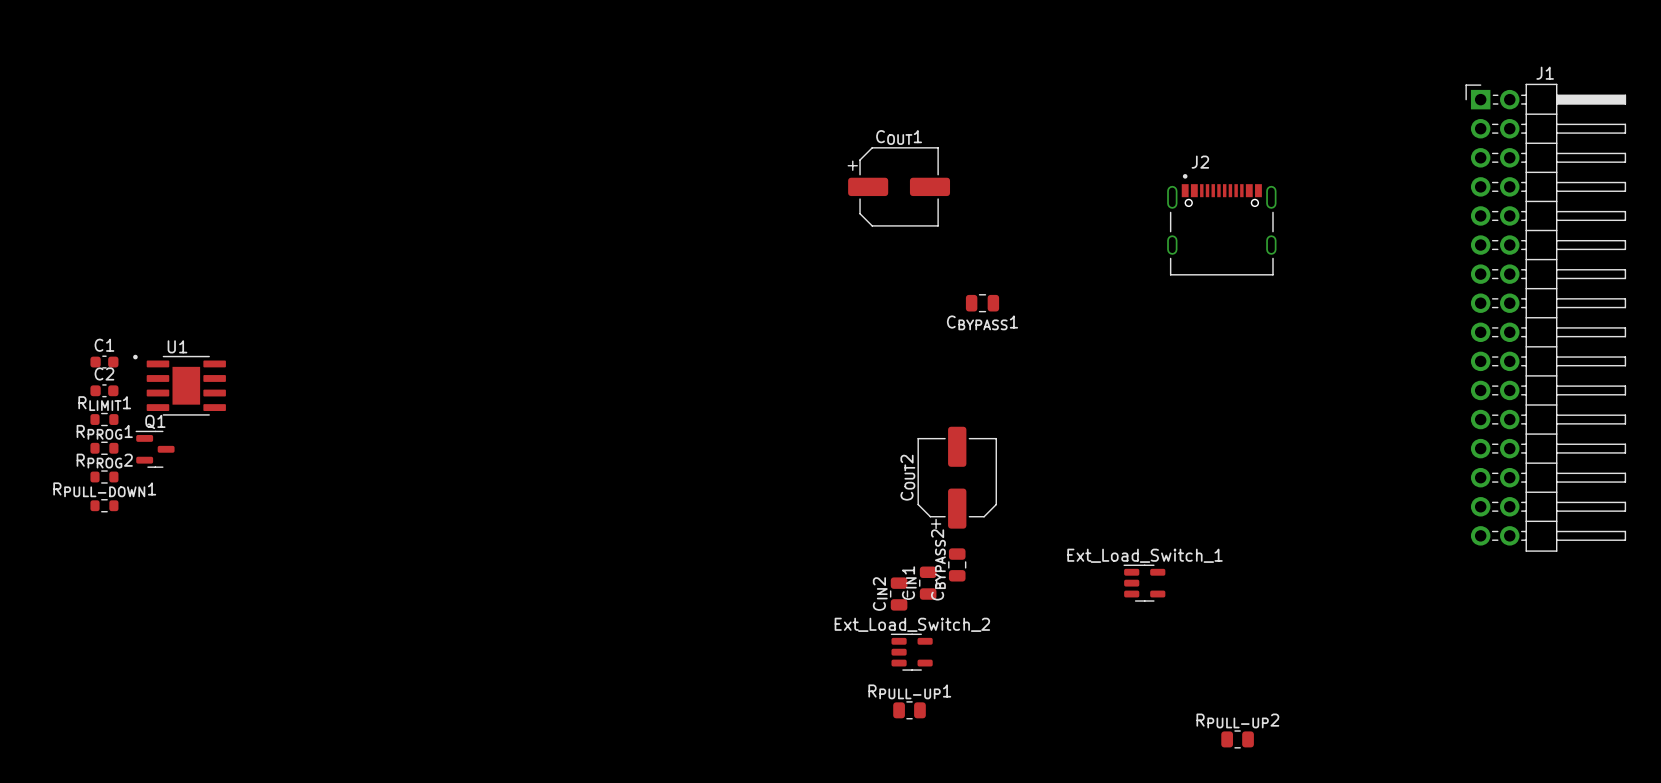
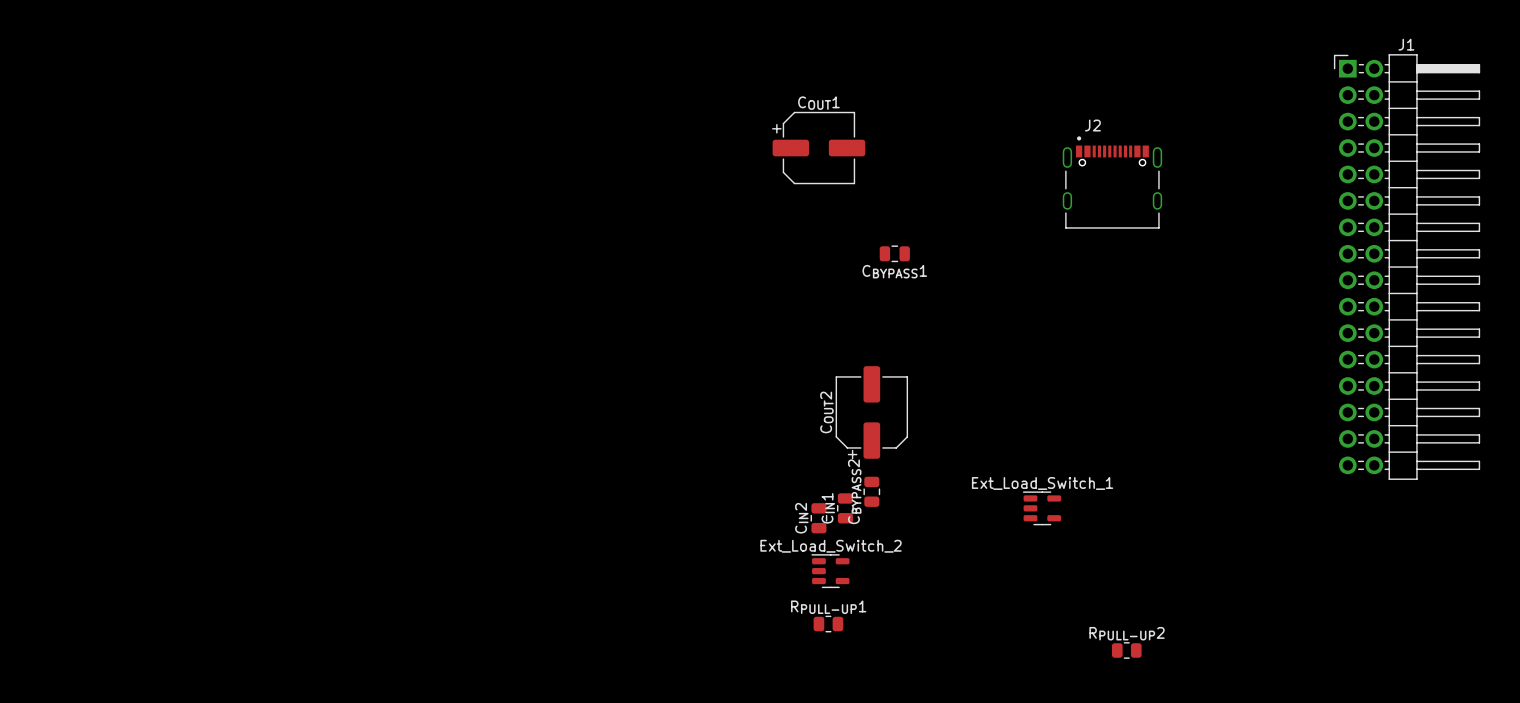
C1: (104, 362) -> none
U1: (179, 385) -> none
C2: (104, 390) -> none
RLIMIT1: (104, 419) -> none
RPROG1: (104, 448) -> none
Q1: (155, 449) -> none
RPROG2: (104, 477) -> none
RPULL-DOWN1: (104, 505) -> none

